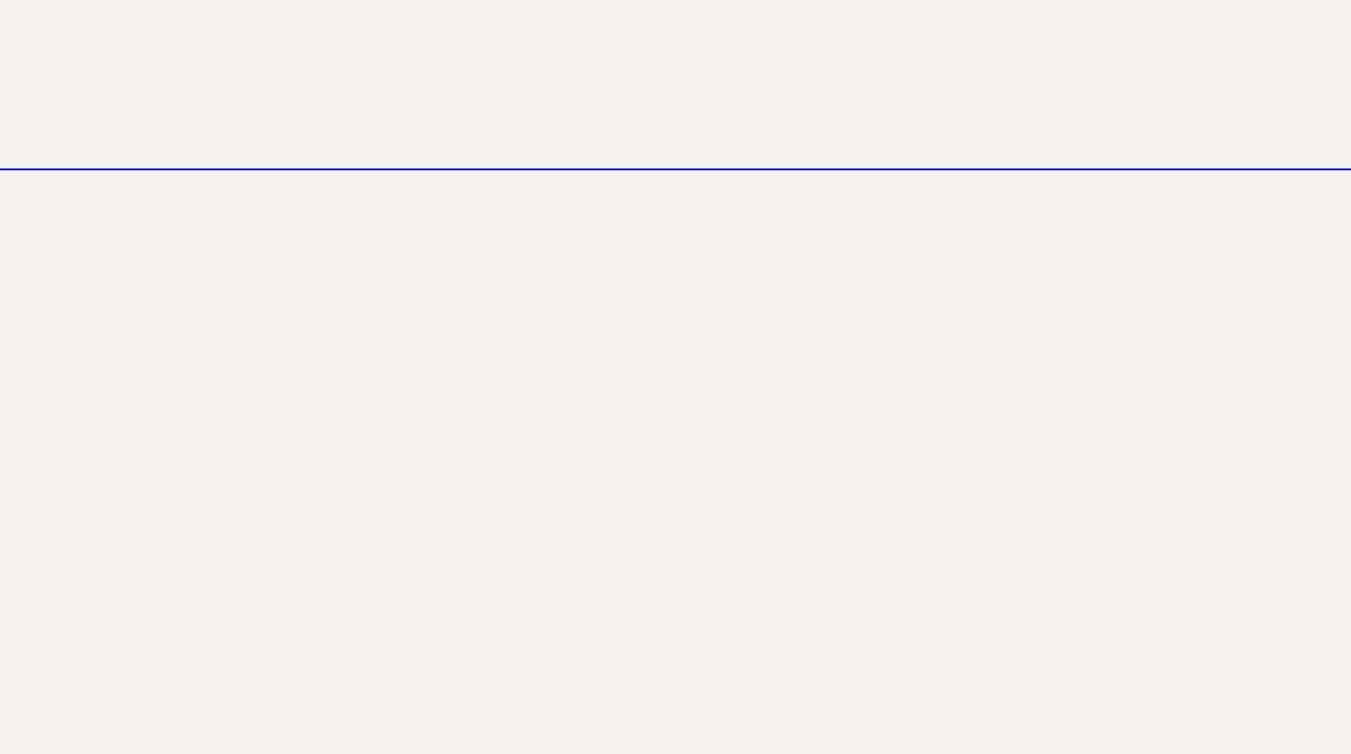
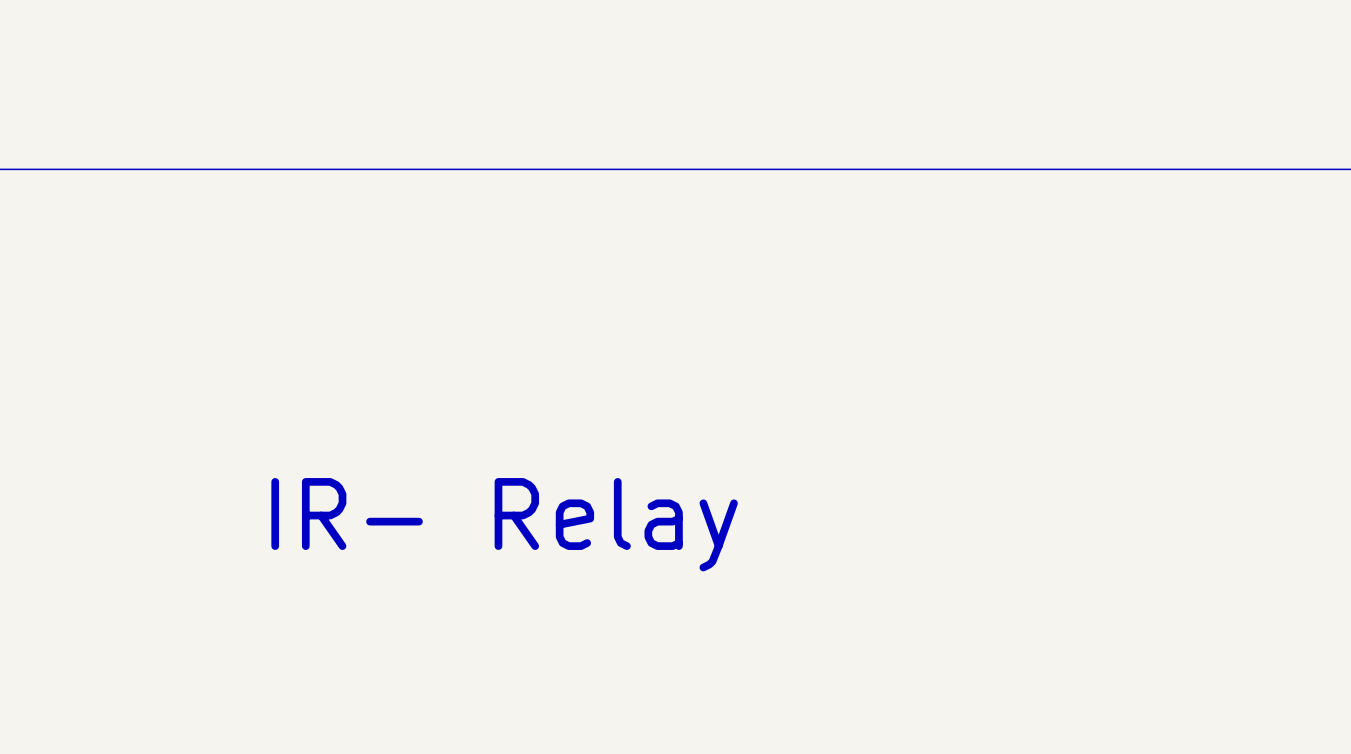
text: none -> IR- Relay (504, 524)

